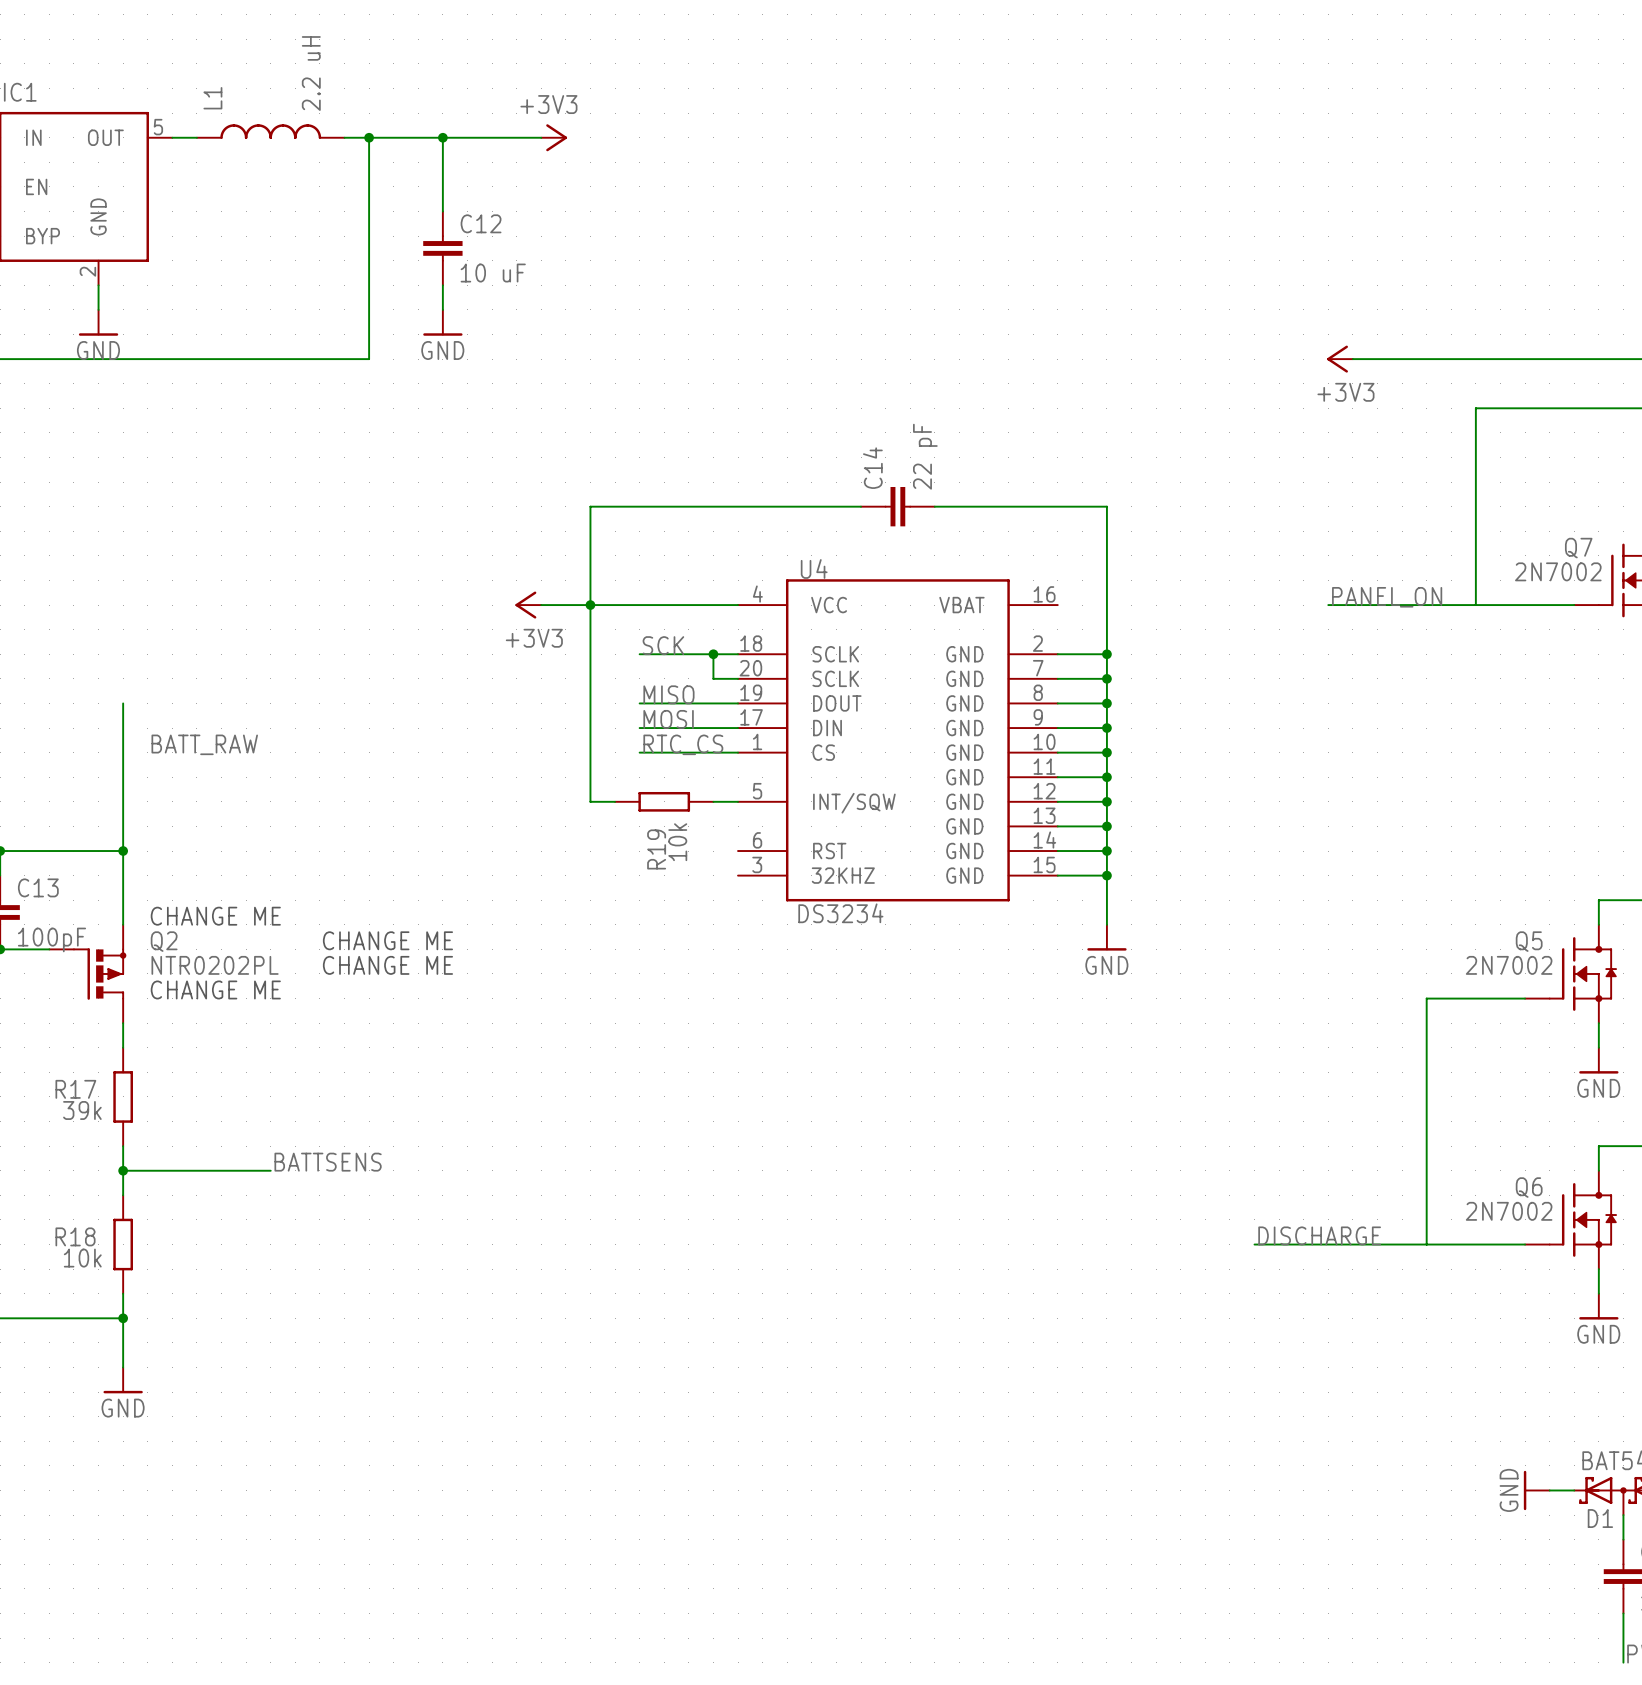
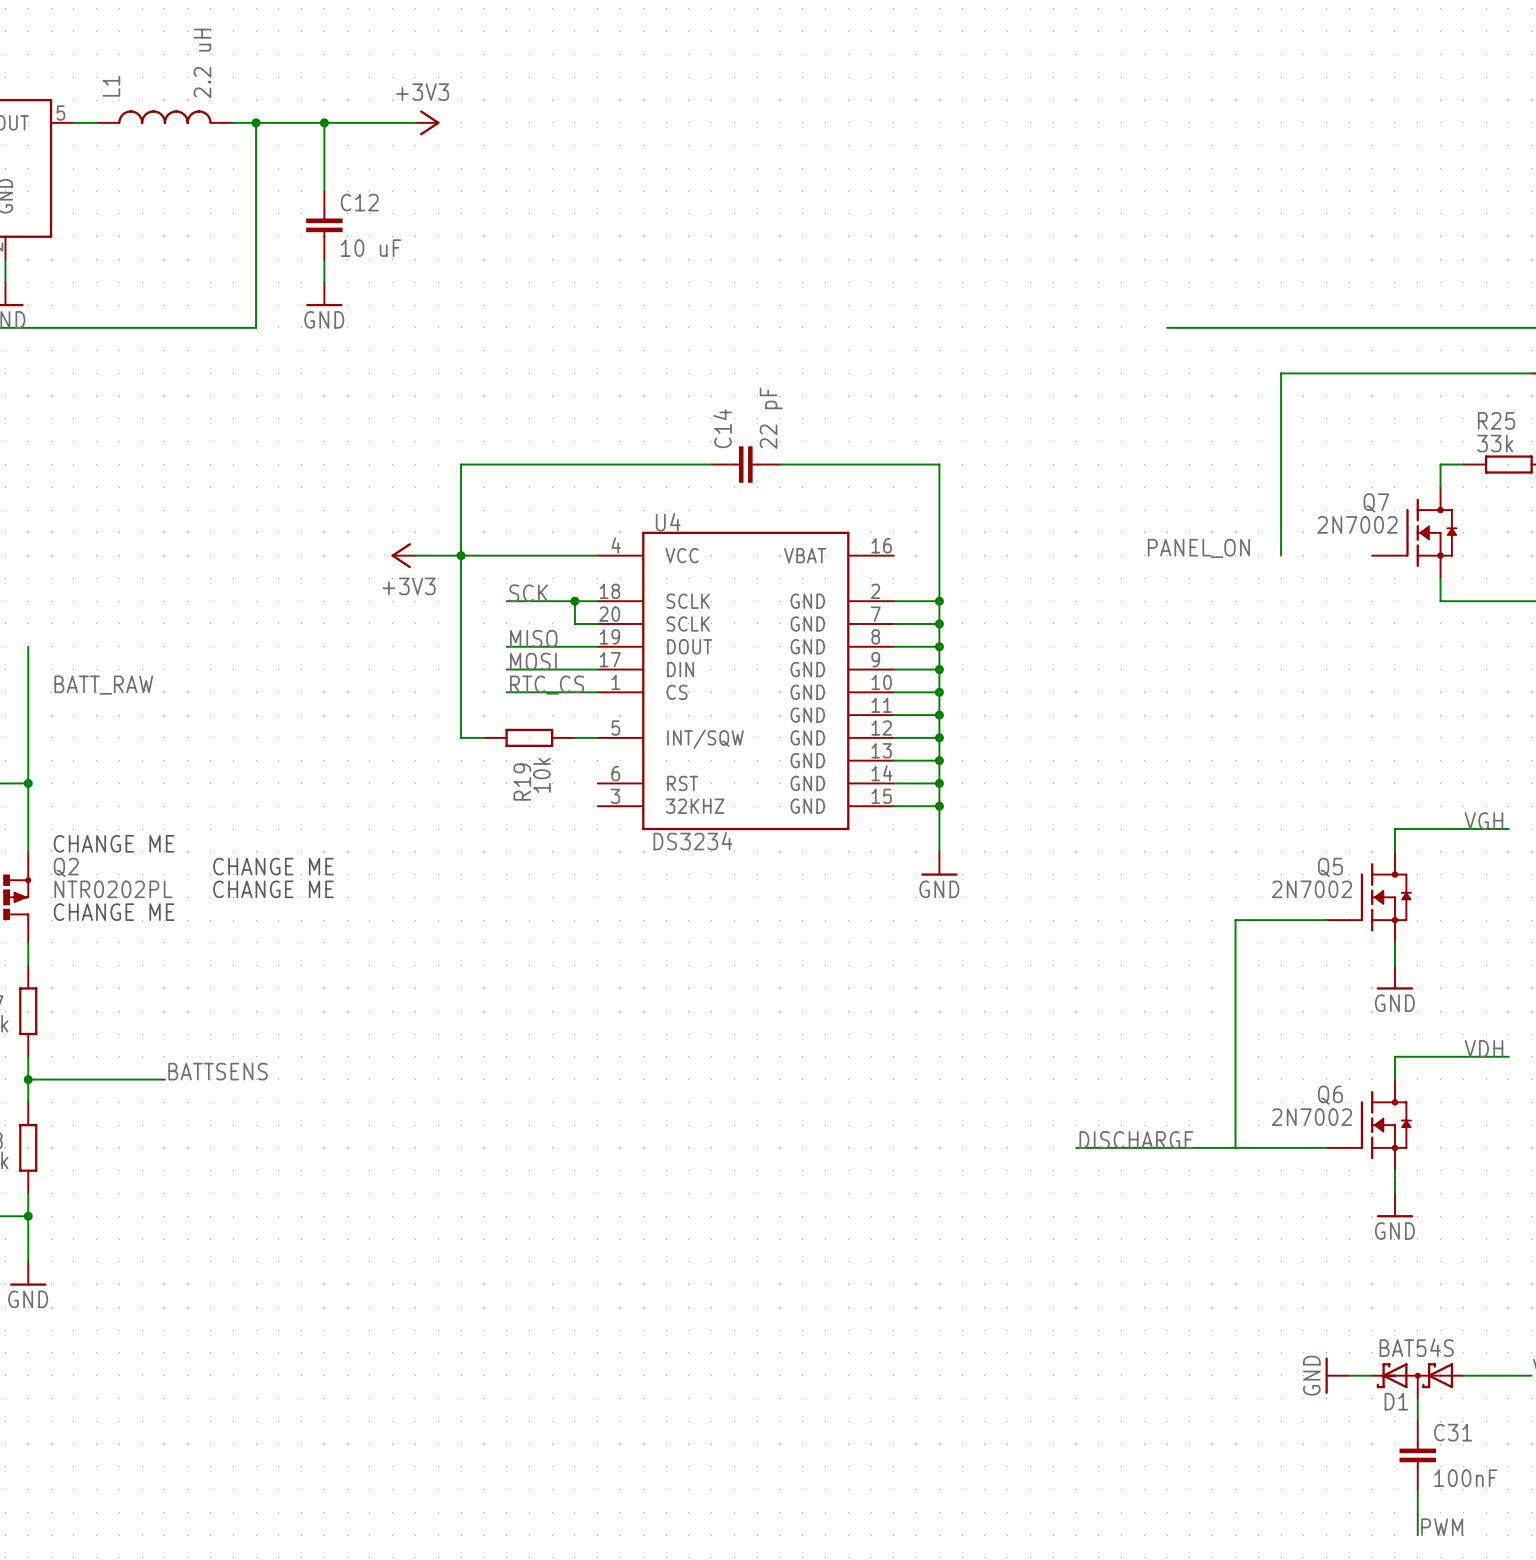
power symbol: +3V3 (1339, 359) -> none
wire: (1328, 605) (1574, 605) -> none

